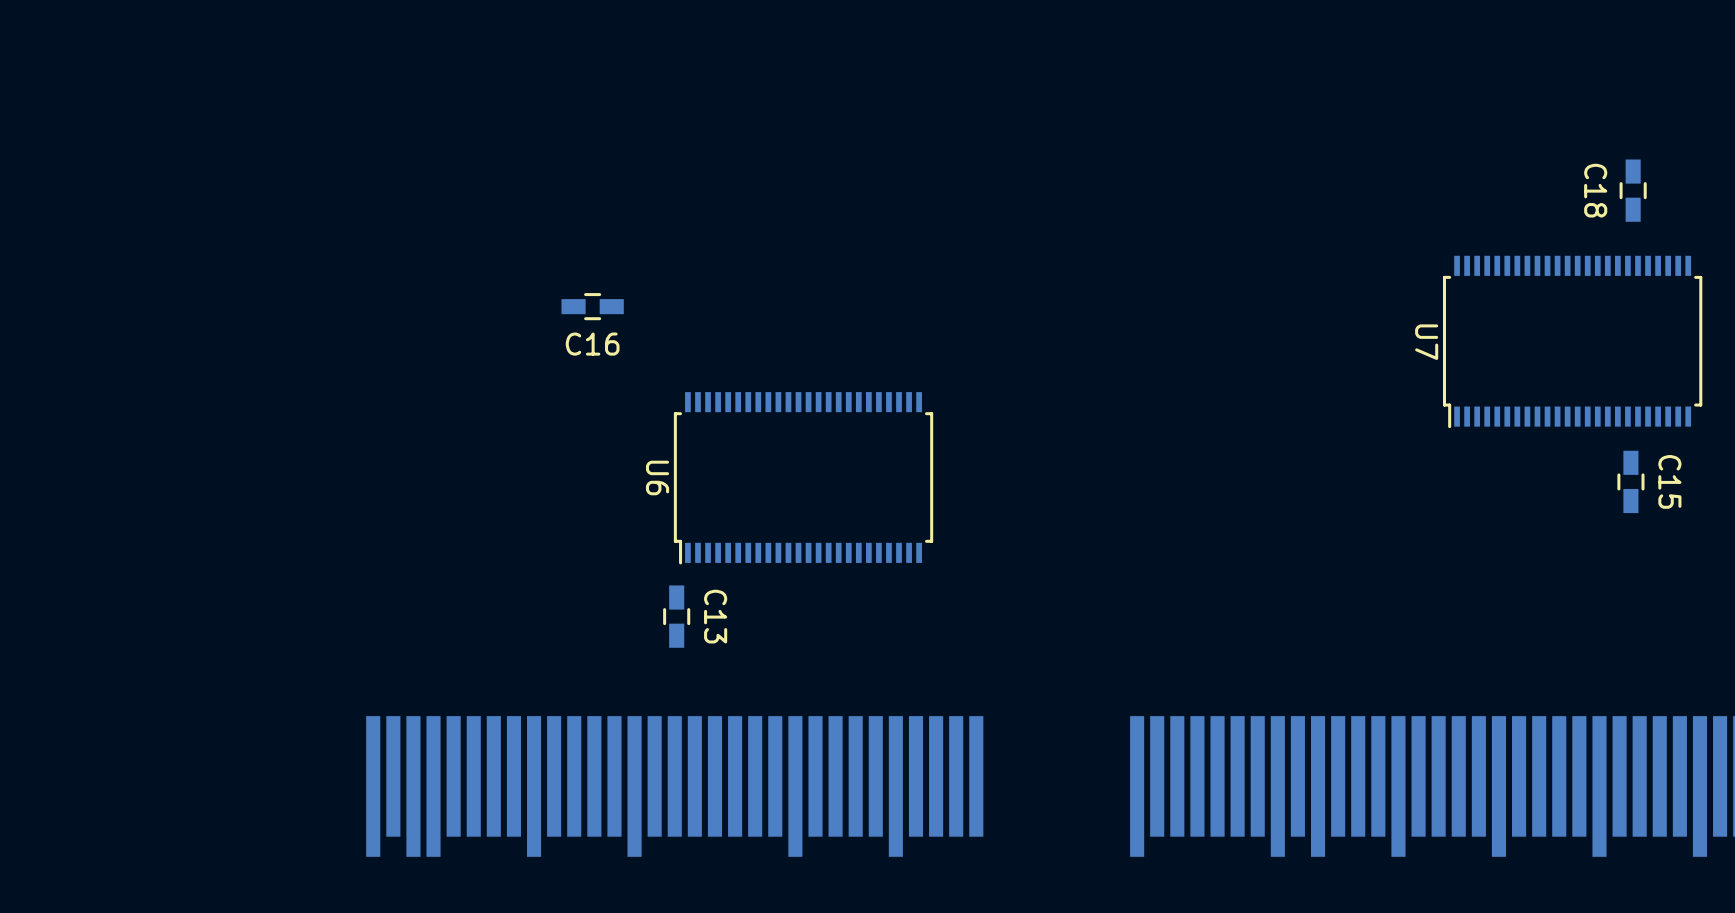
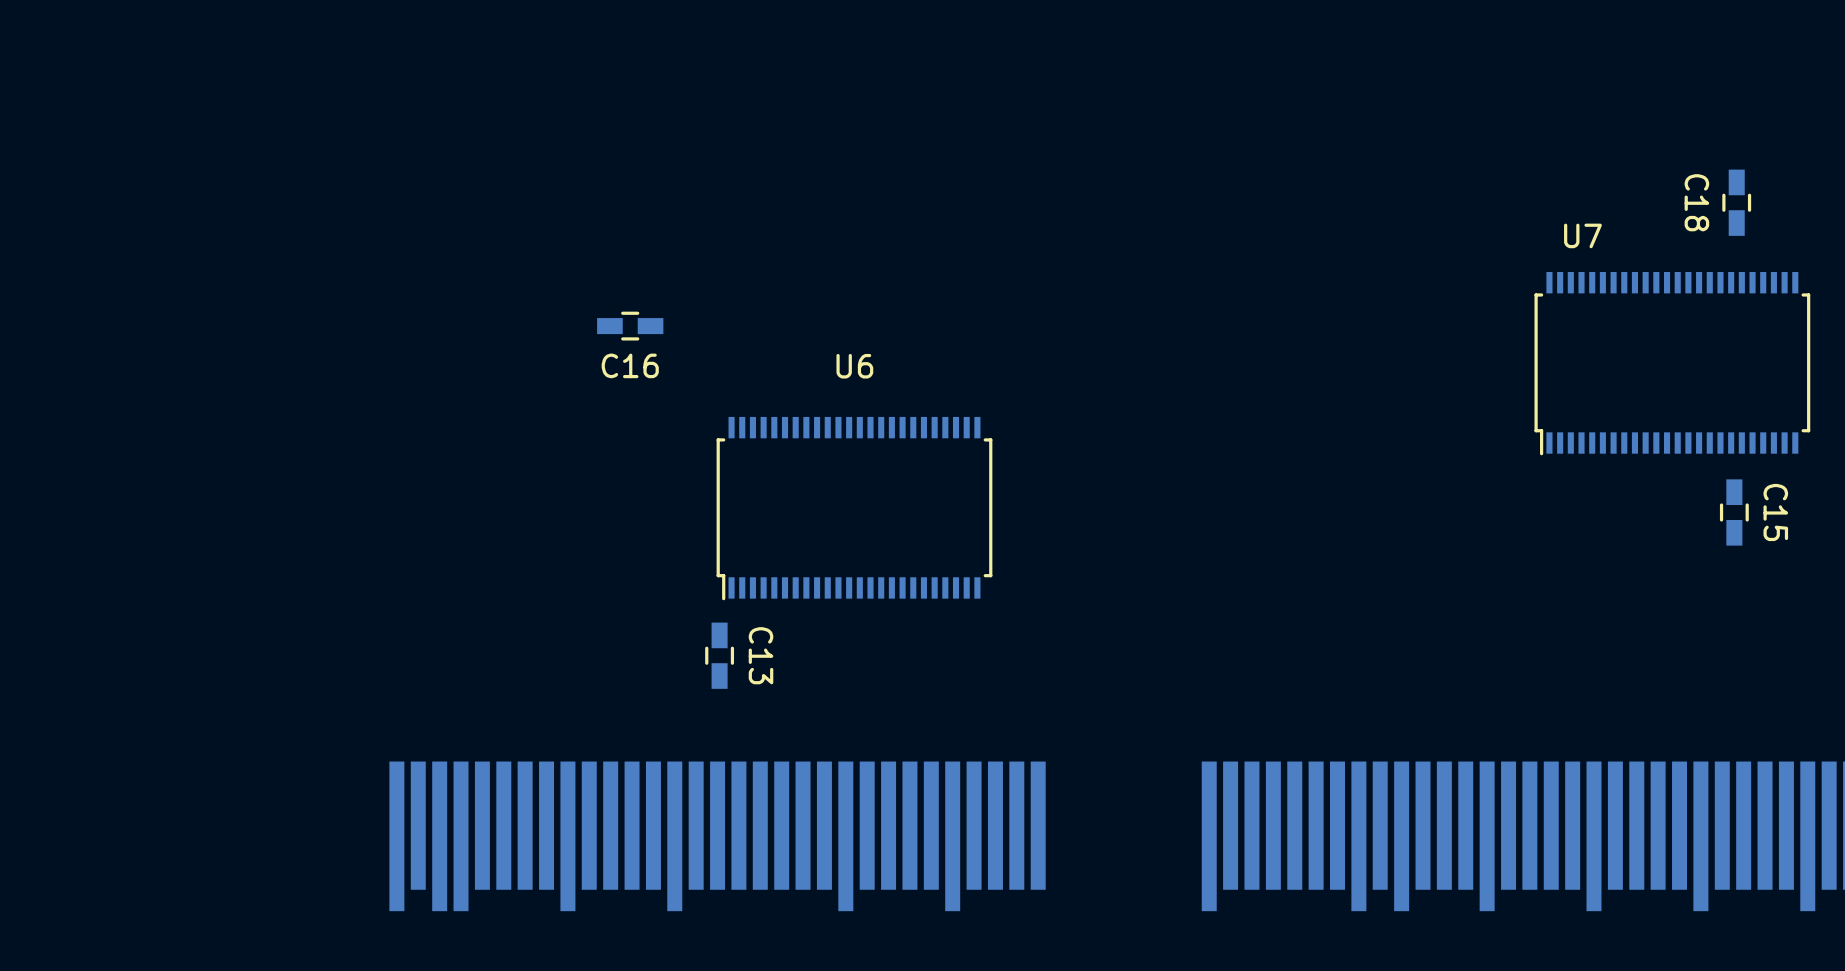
U7 name rotation: 0° (1426, 342) -> 90° counterclockwise (1582, 235)
U7 name position: U7 (1426, 342) -> U7 (1582, 235)
U6 name rotation: 0° (657, 477) -> 90° counterclockwise (854, 366)
U6 name position: U6 (657, 477) -> U6 (854, 366)

